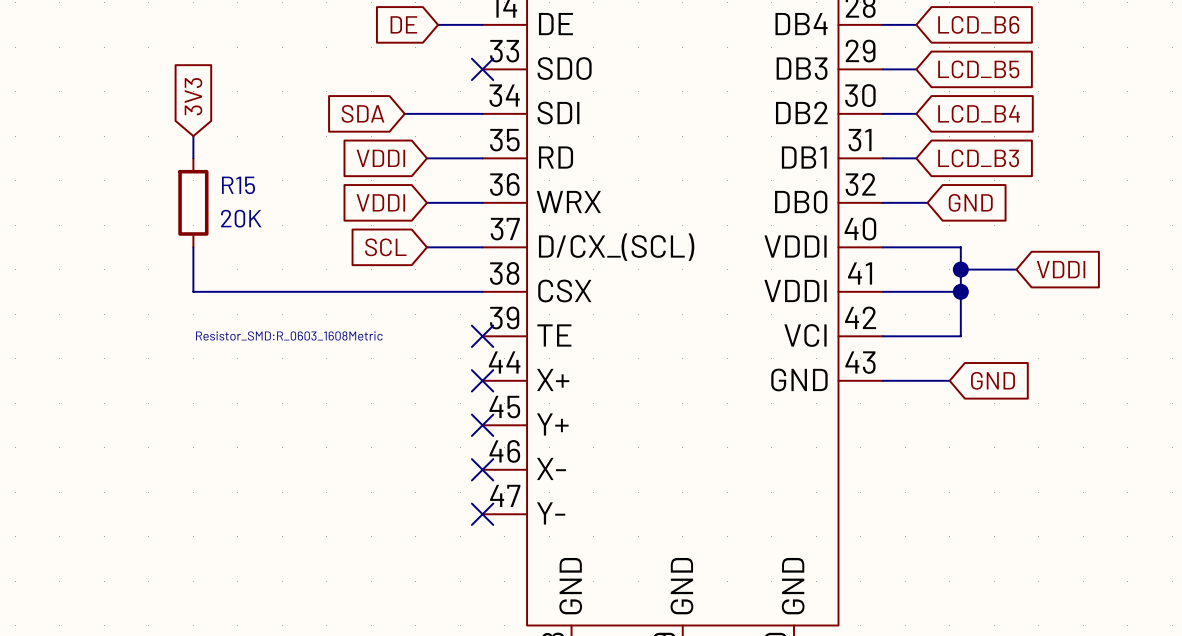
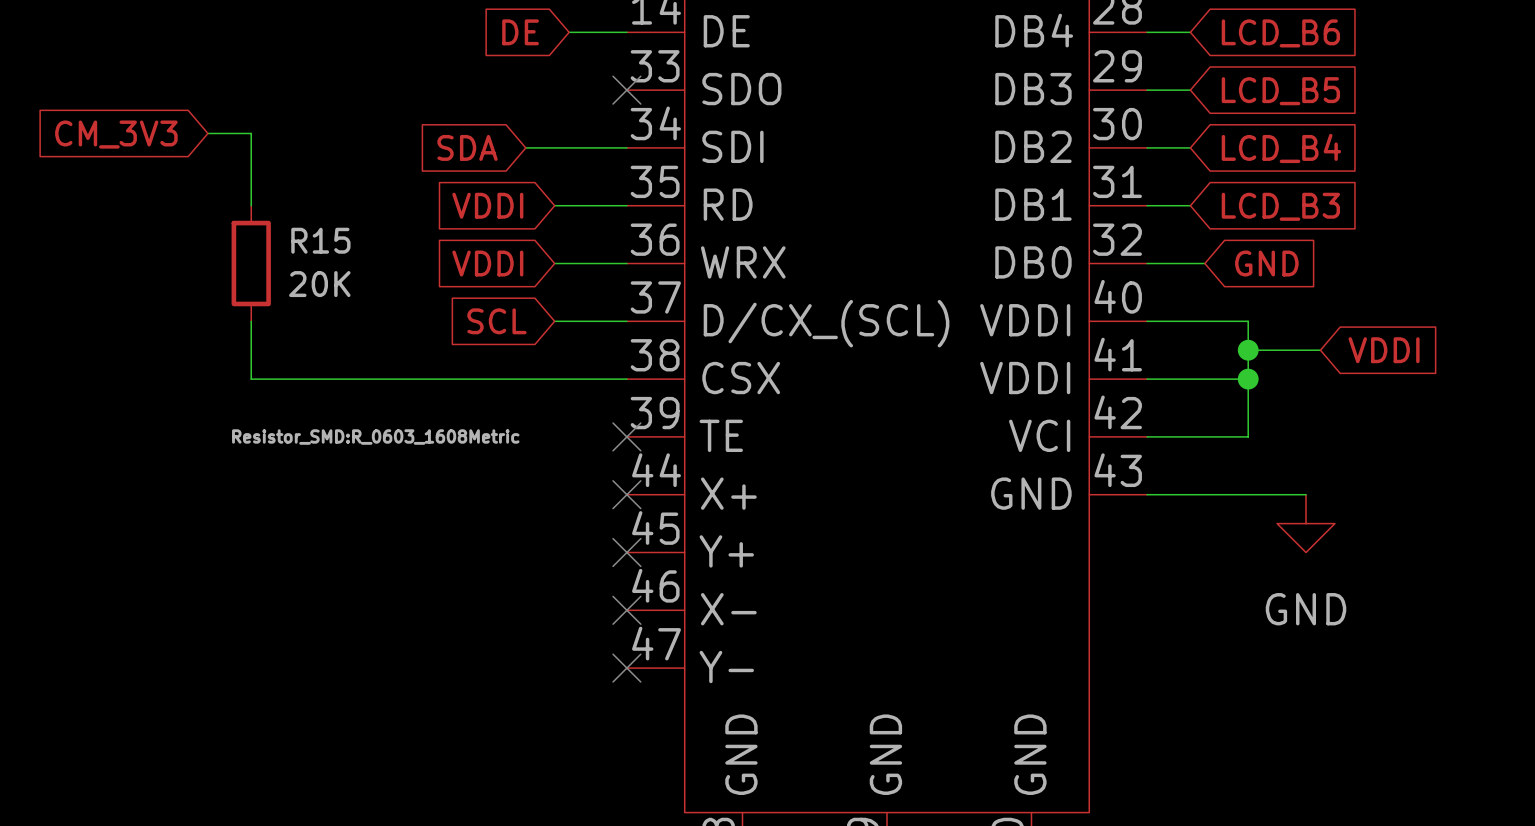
global label: 3V3 (193, 96) -> none
global label: none -> CM_3V3 (116, 134)
wire: none -> (207, 133) (251, 133) (251, 176)
wire: none -> (1233, 494) (1306, 494)
global label: GND (992, 380) -> none
power symbol: none -> GND (1306, 523)

